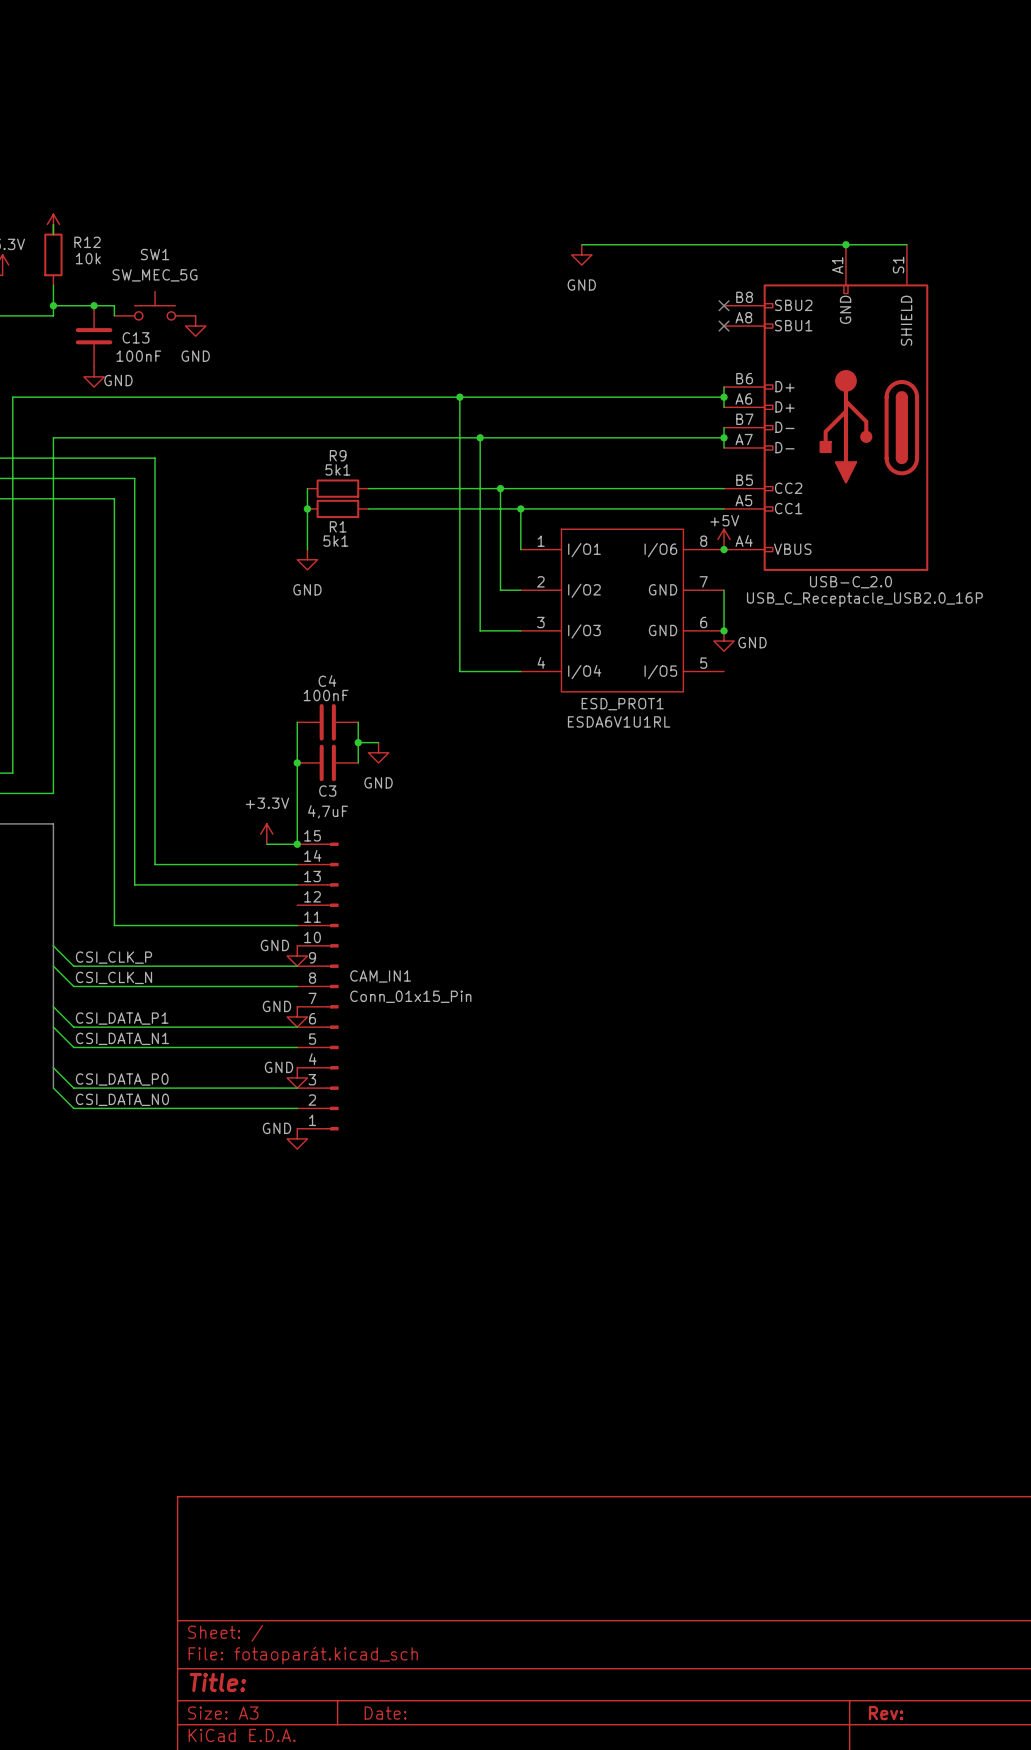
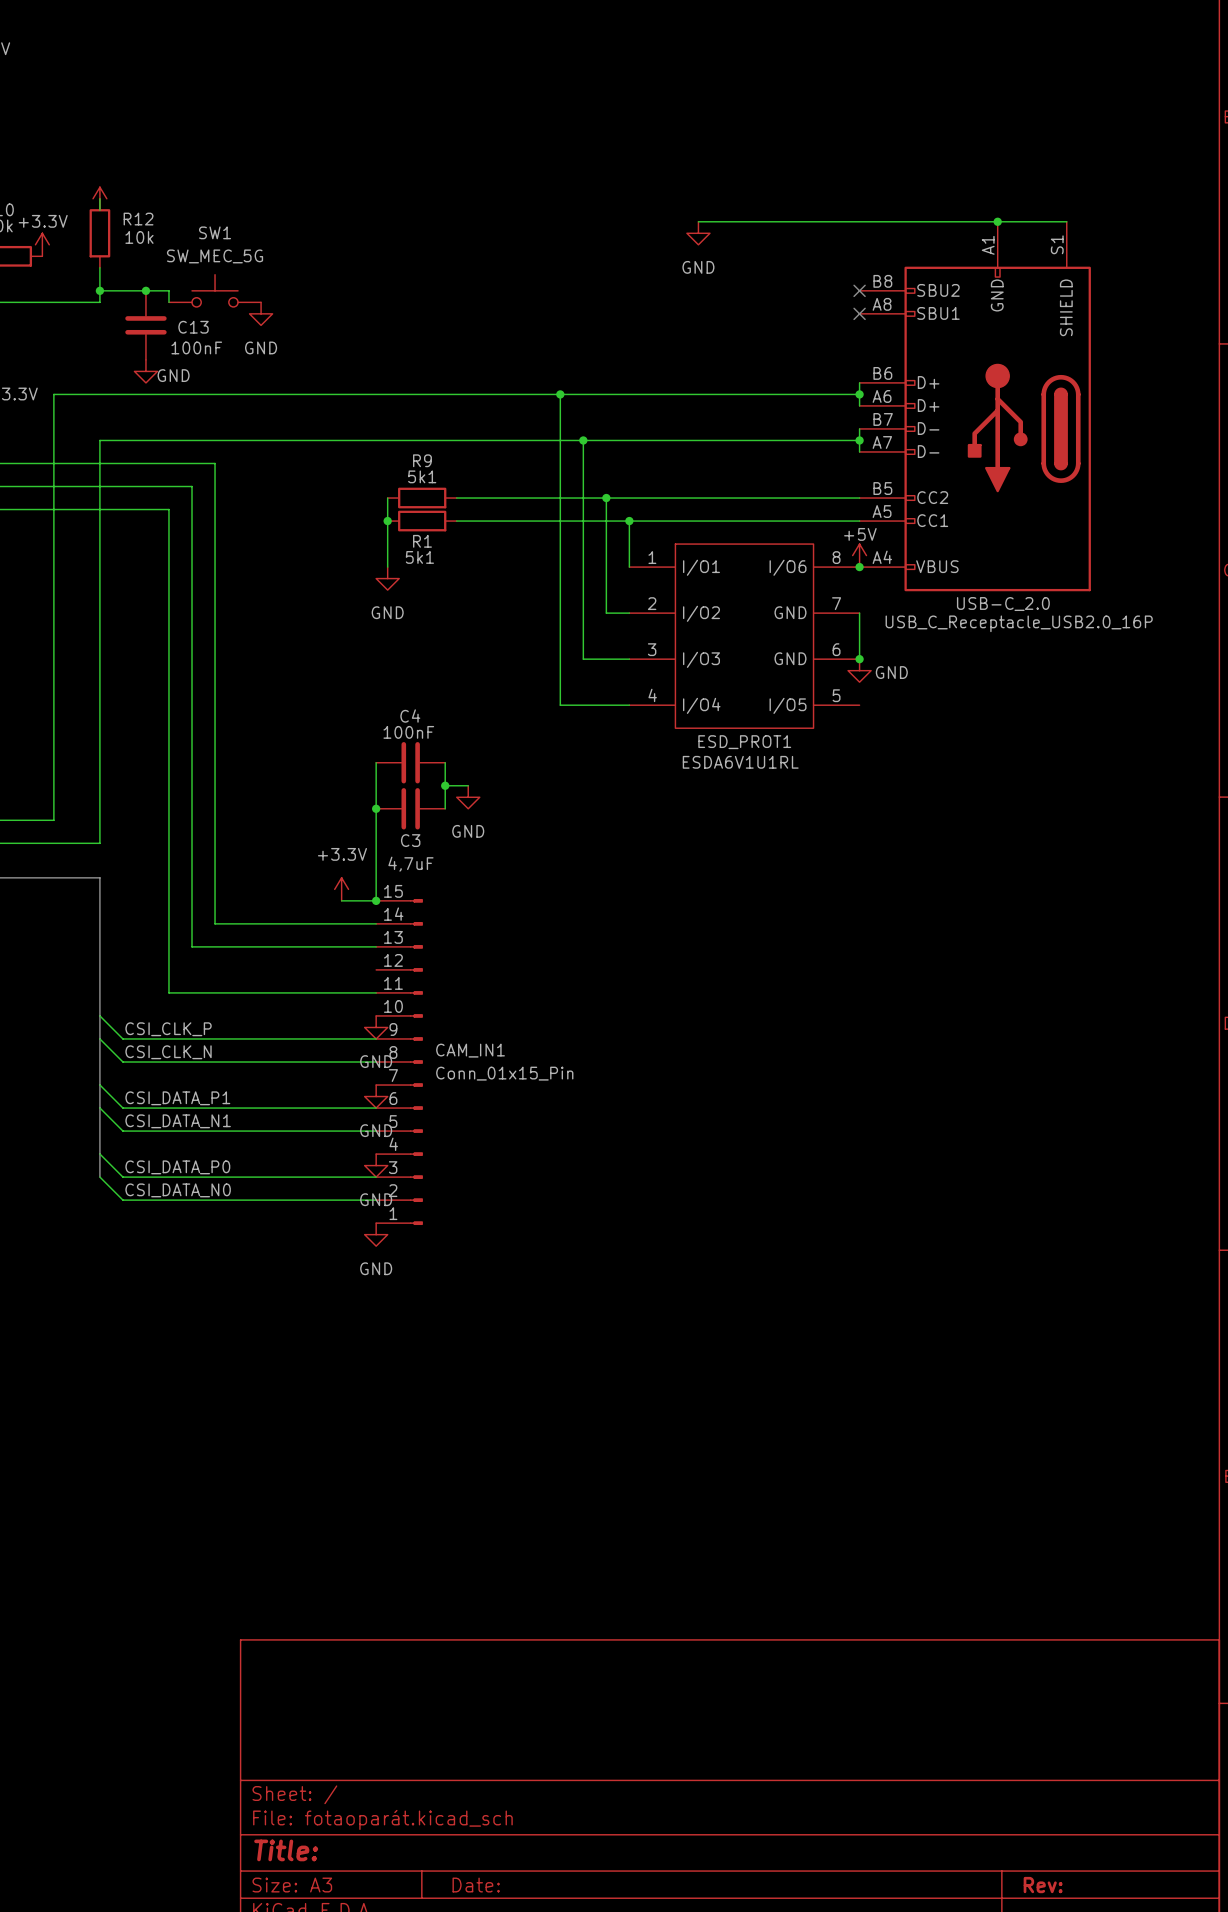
power symbol text position: GND (274, 945) -> GND (376, 1061)
power symbol text position: GND (276, 1006) -> GND (376, 1130)
power symbol text position: GND (278, 1067) -> GND (376, 1199)
power symbol text position: GND (276, 1128) -> GND (376, 1268)

